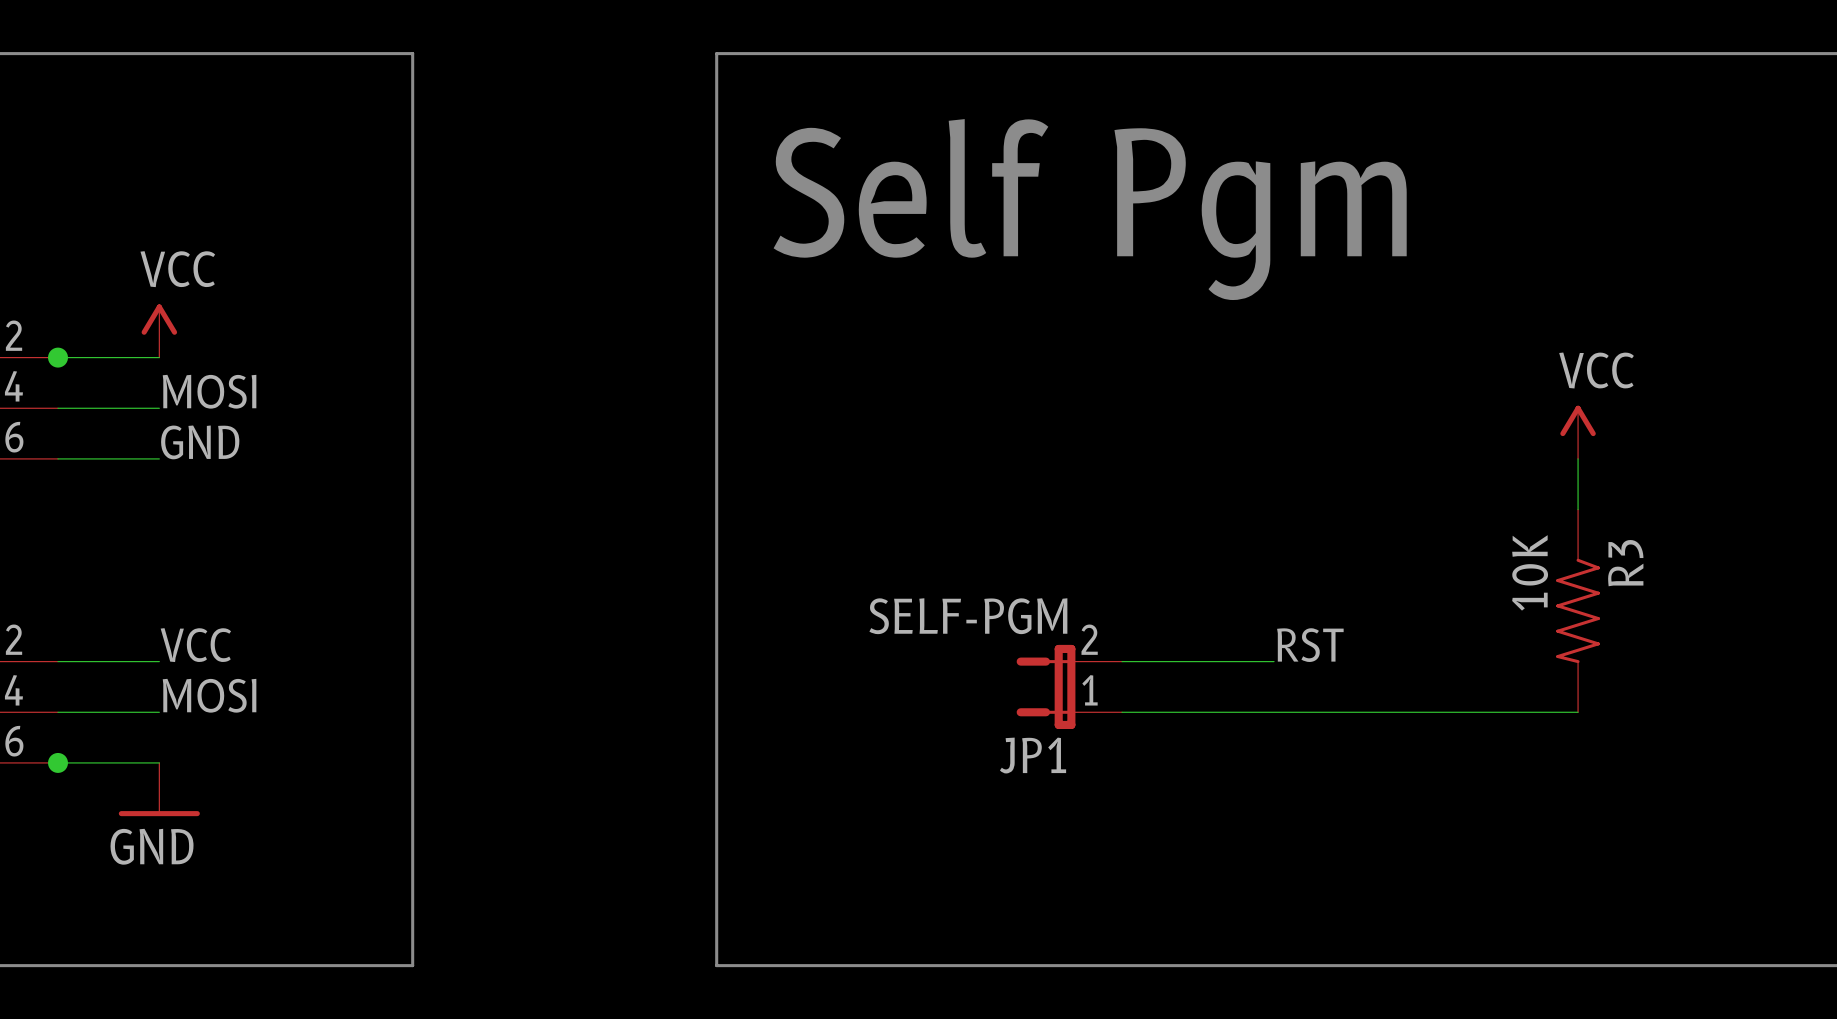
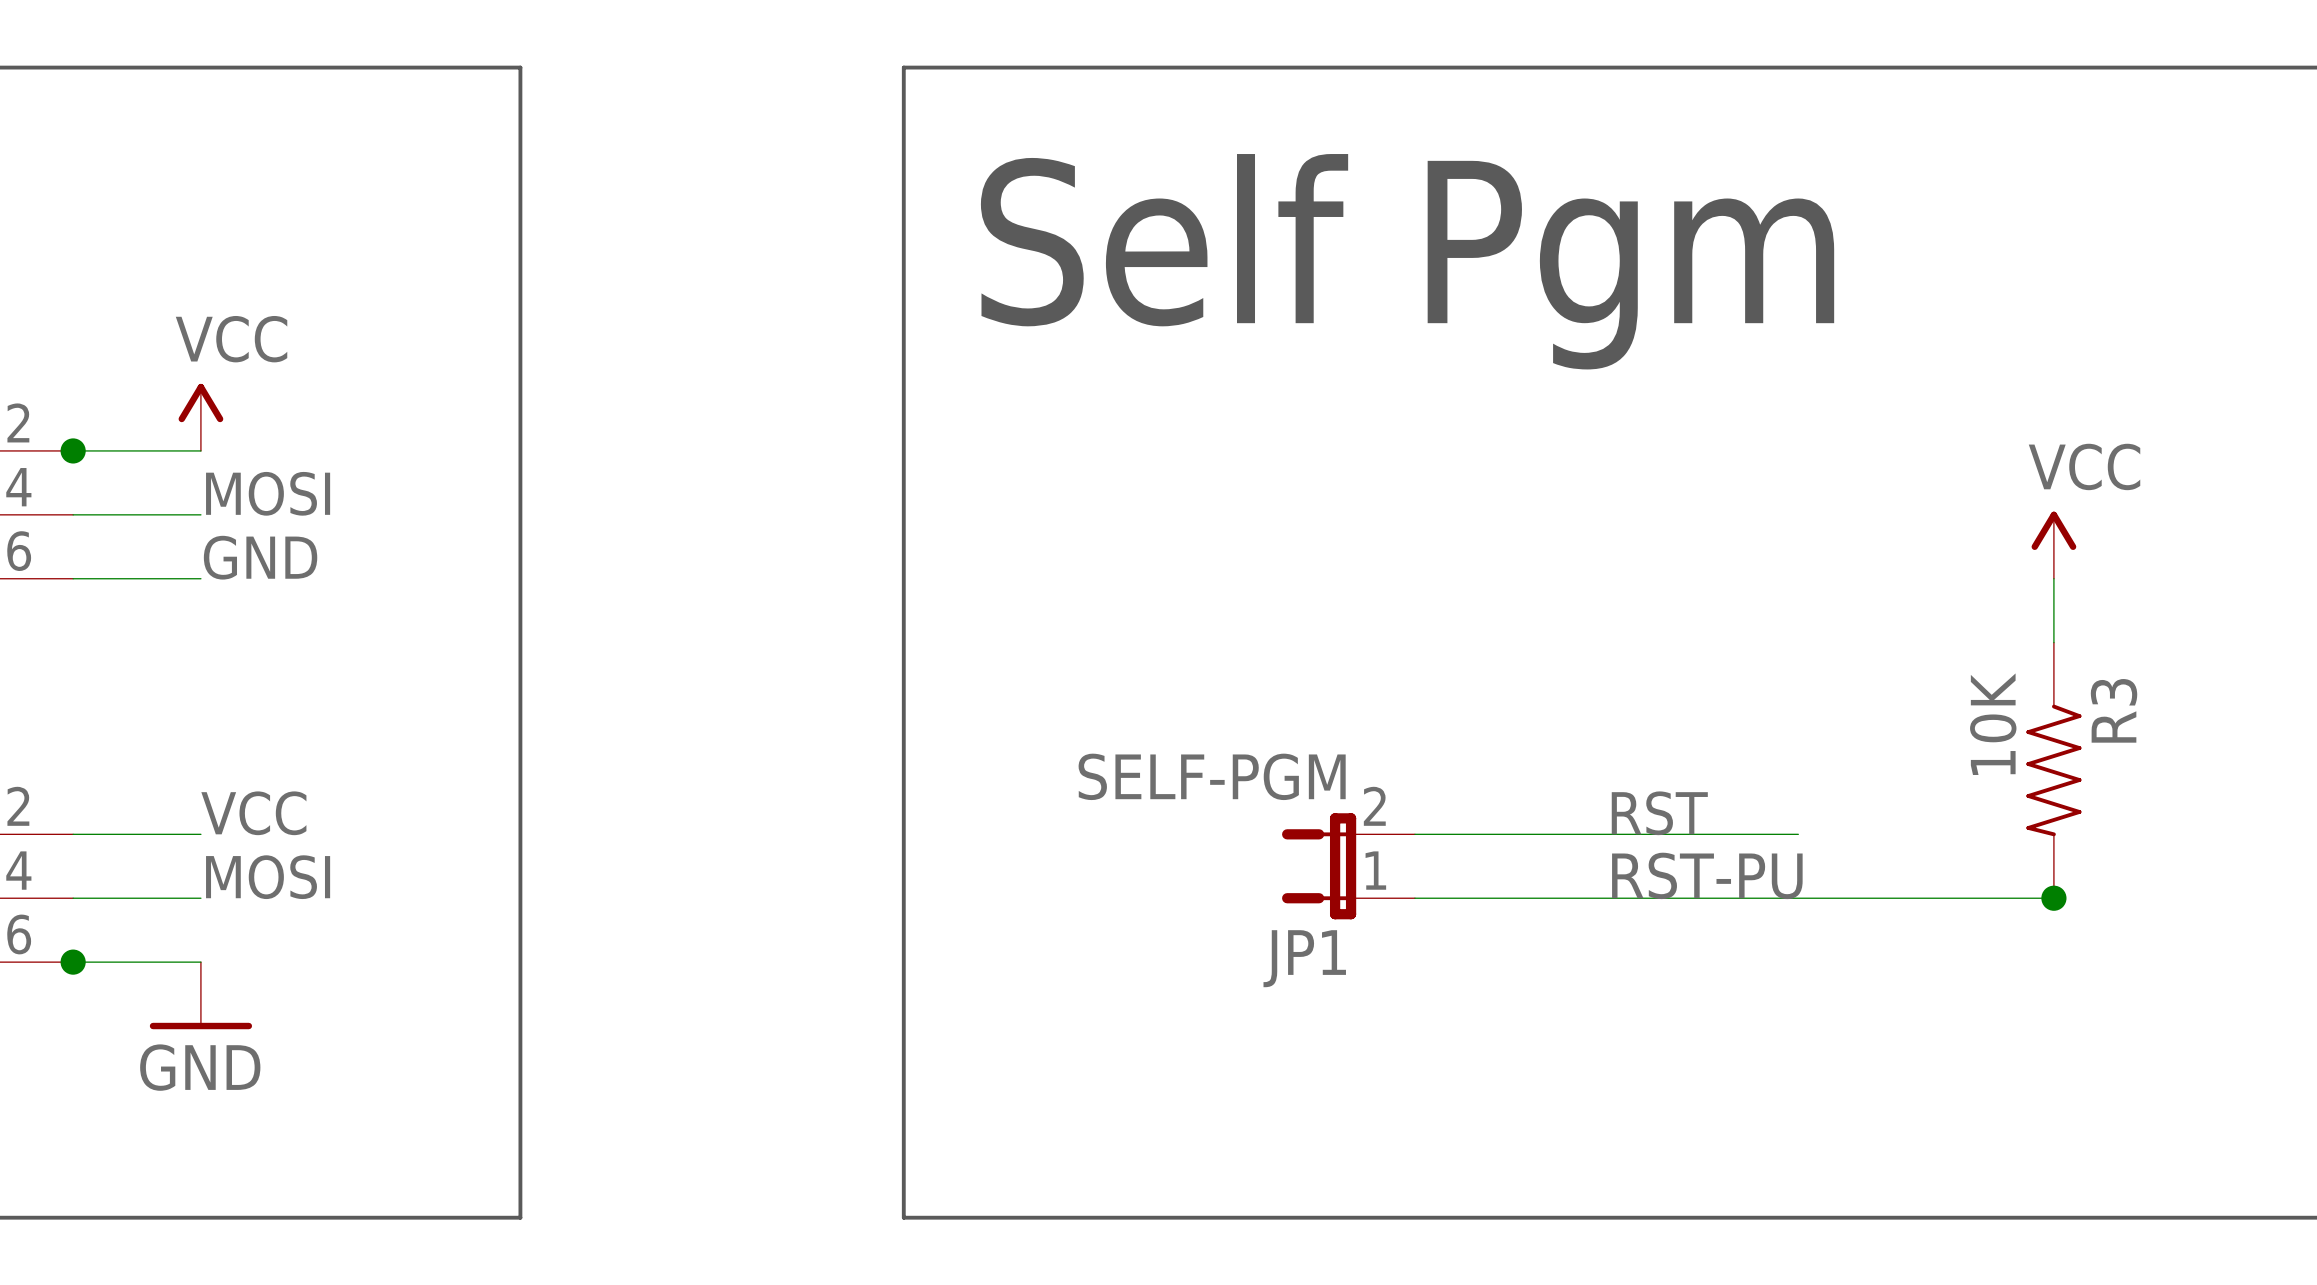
power symbol position: VCC (1578, 432) -> VCC (2053, 545)
wire: (1578, 458) (1578, 509) -> (2053, 578) (2053, 642)
R3 position: (1578, 610) -> (2053, 770)
wire: none -> (1606, 834) (1798, 834)
label: none -> RST-PU (1707, 875)
wire: none -> (1990, 898) (2053, 898)
junction: none -> (2053, 898)

